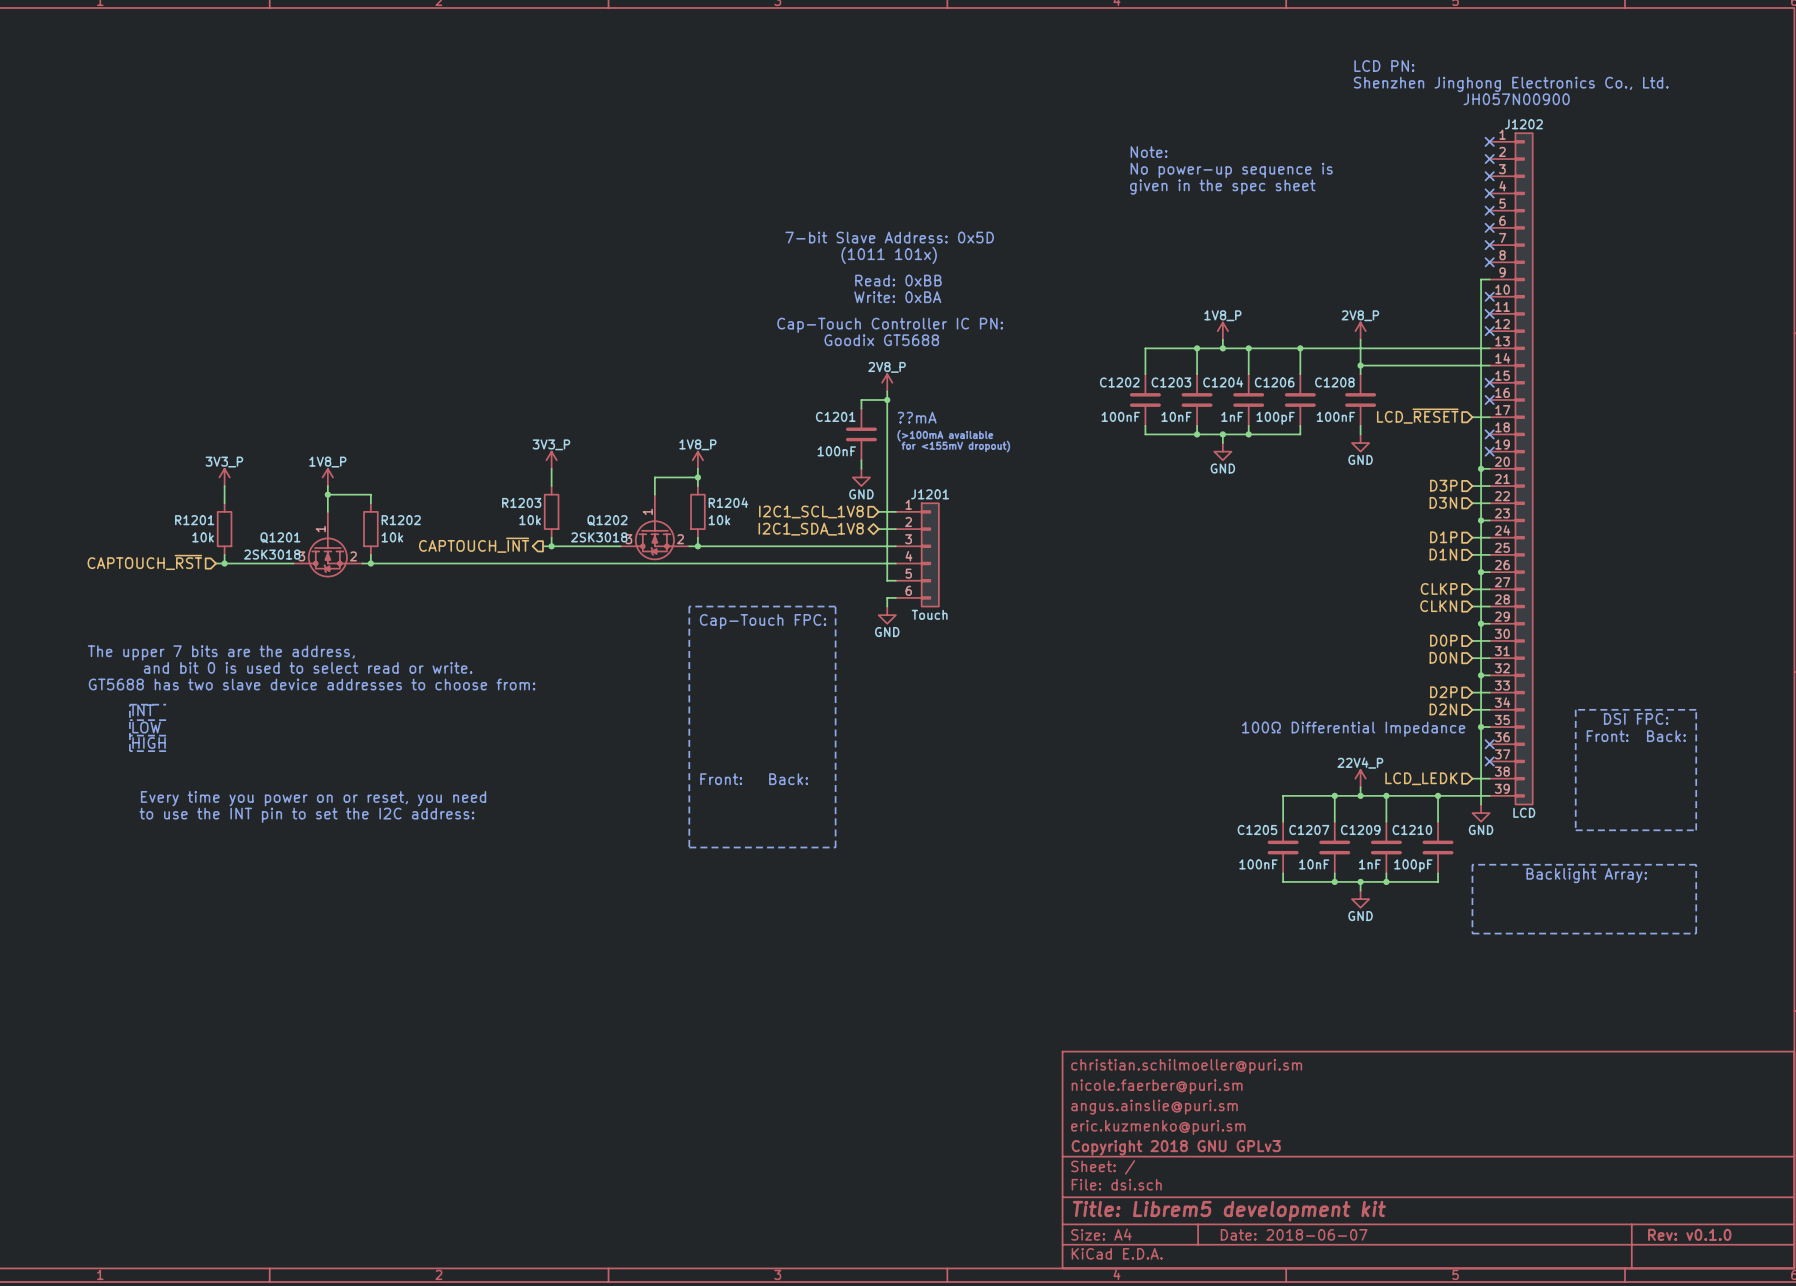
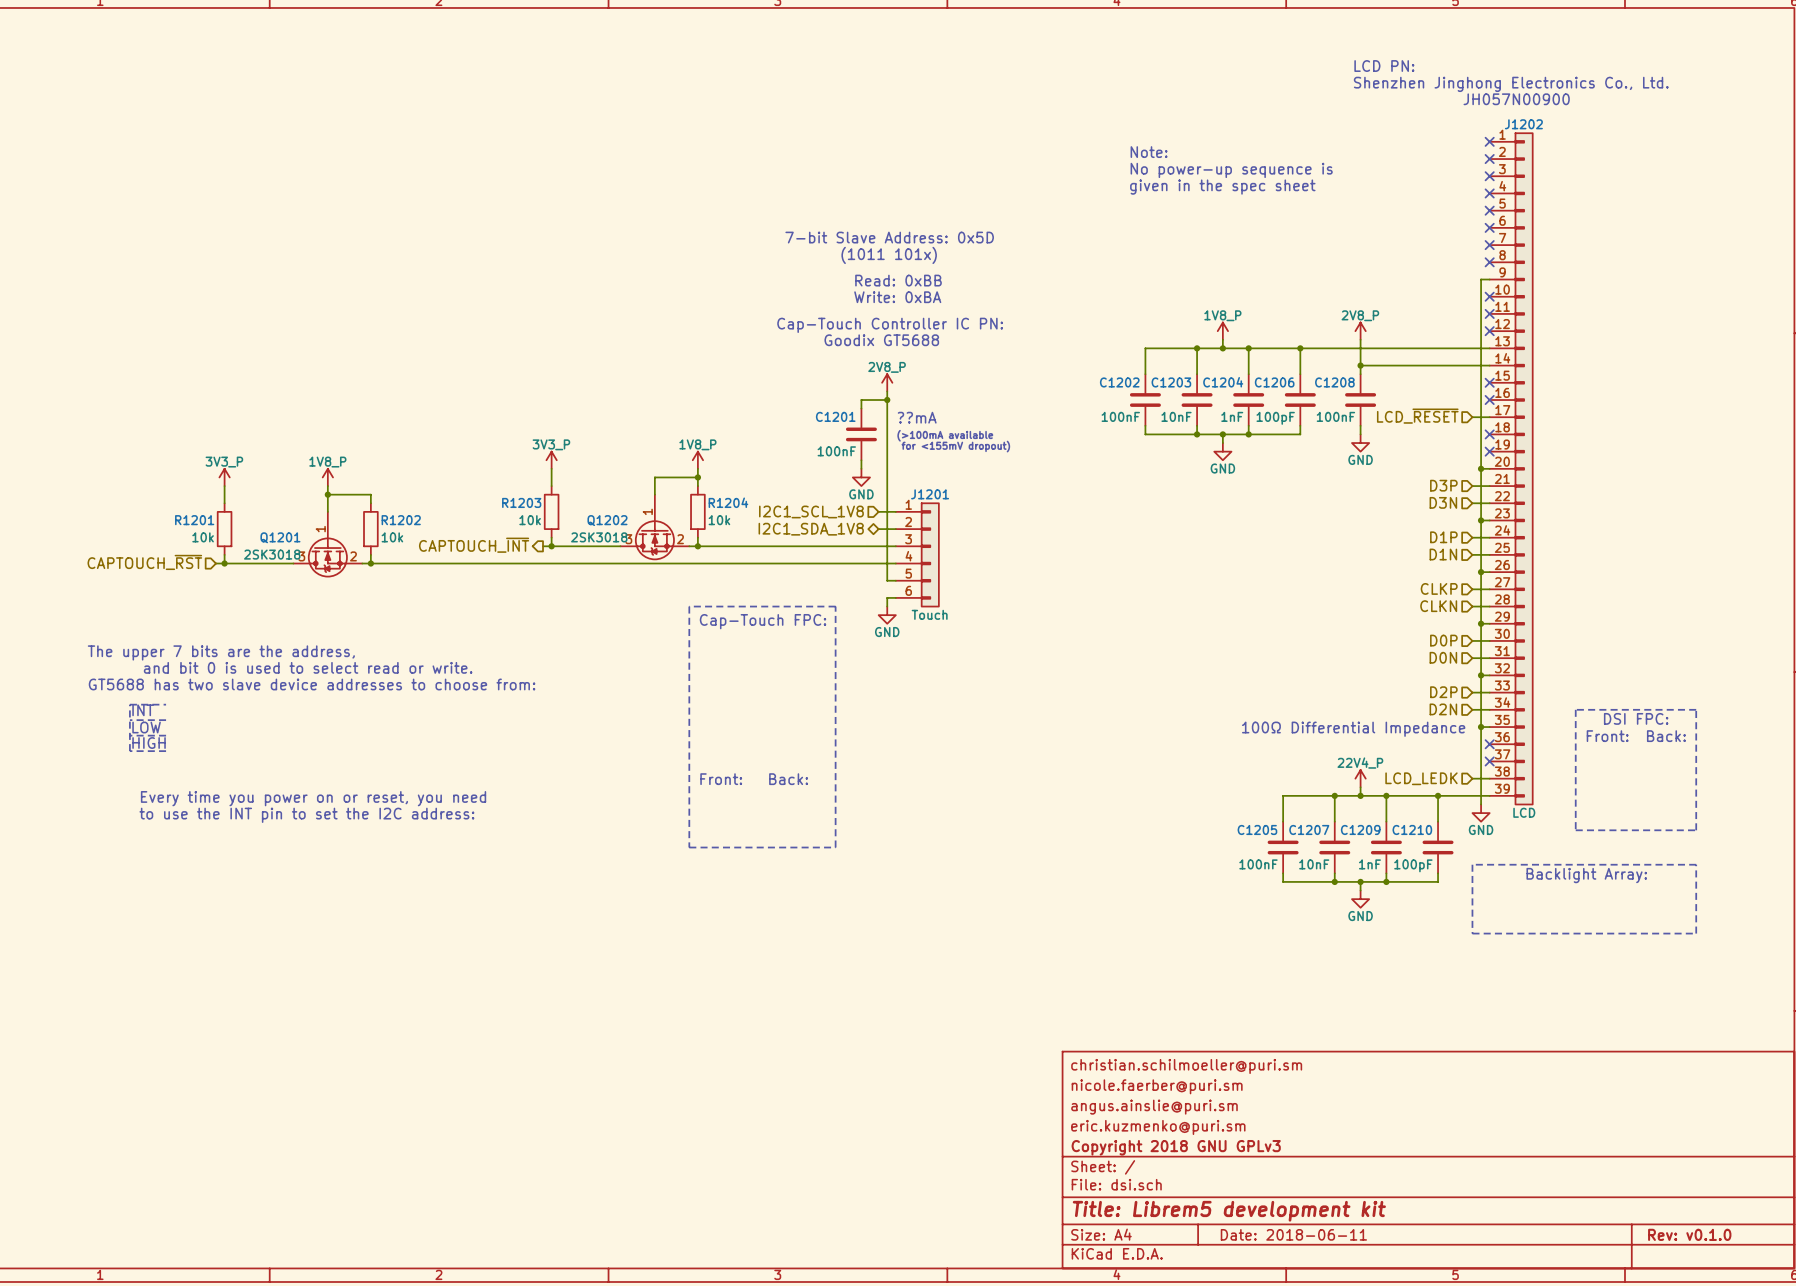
title block: Date: 2018-06-07 (1294, 1234) -> Date: 2018-06-11 (1293, 1234)

